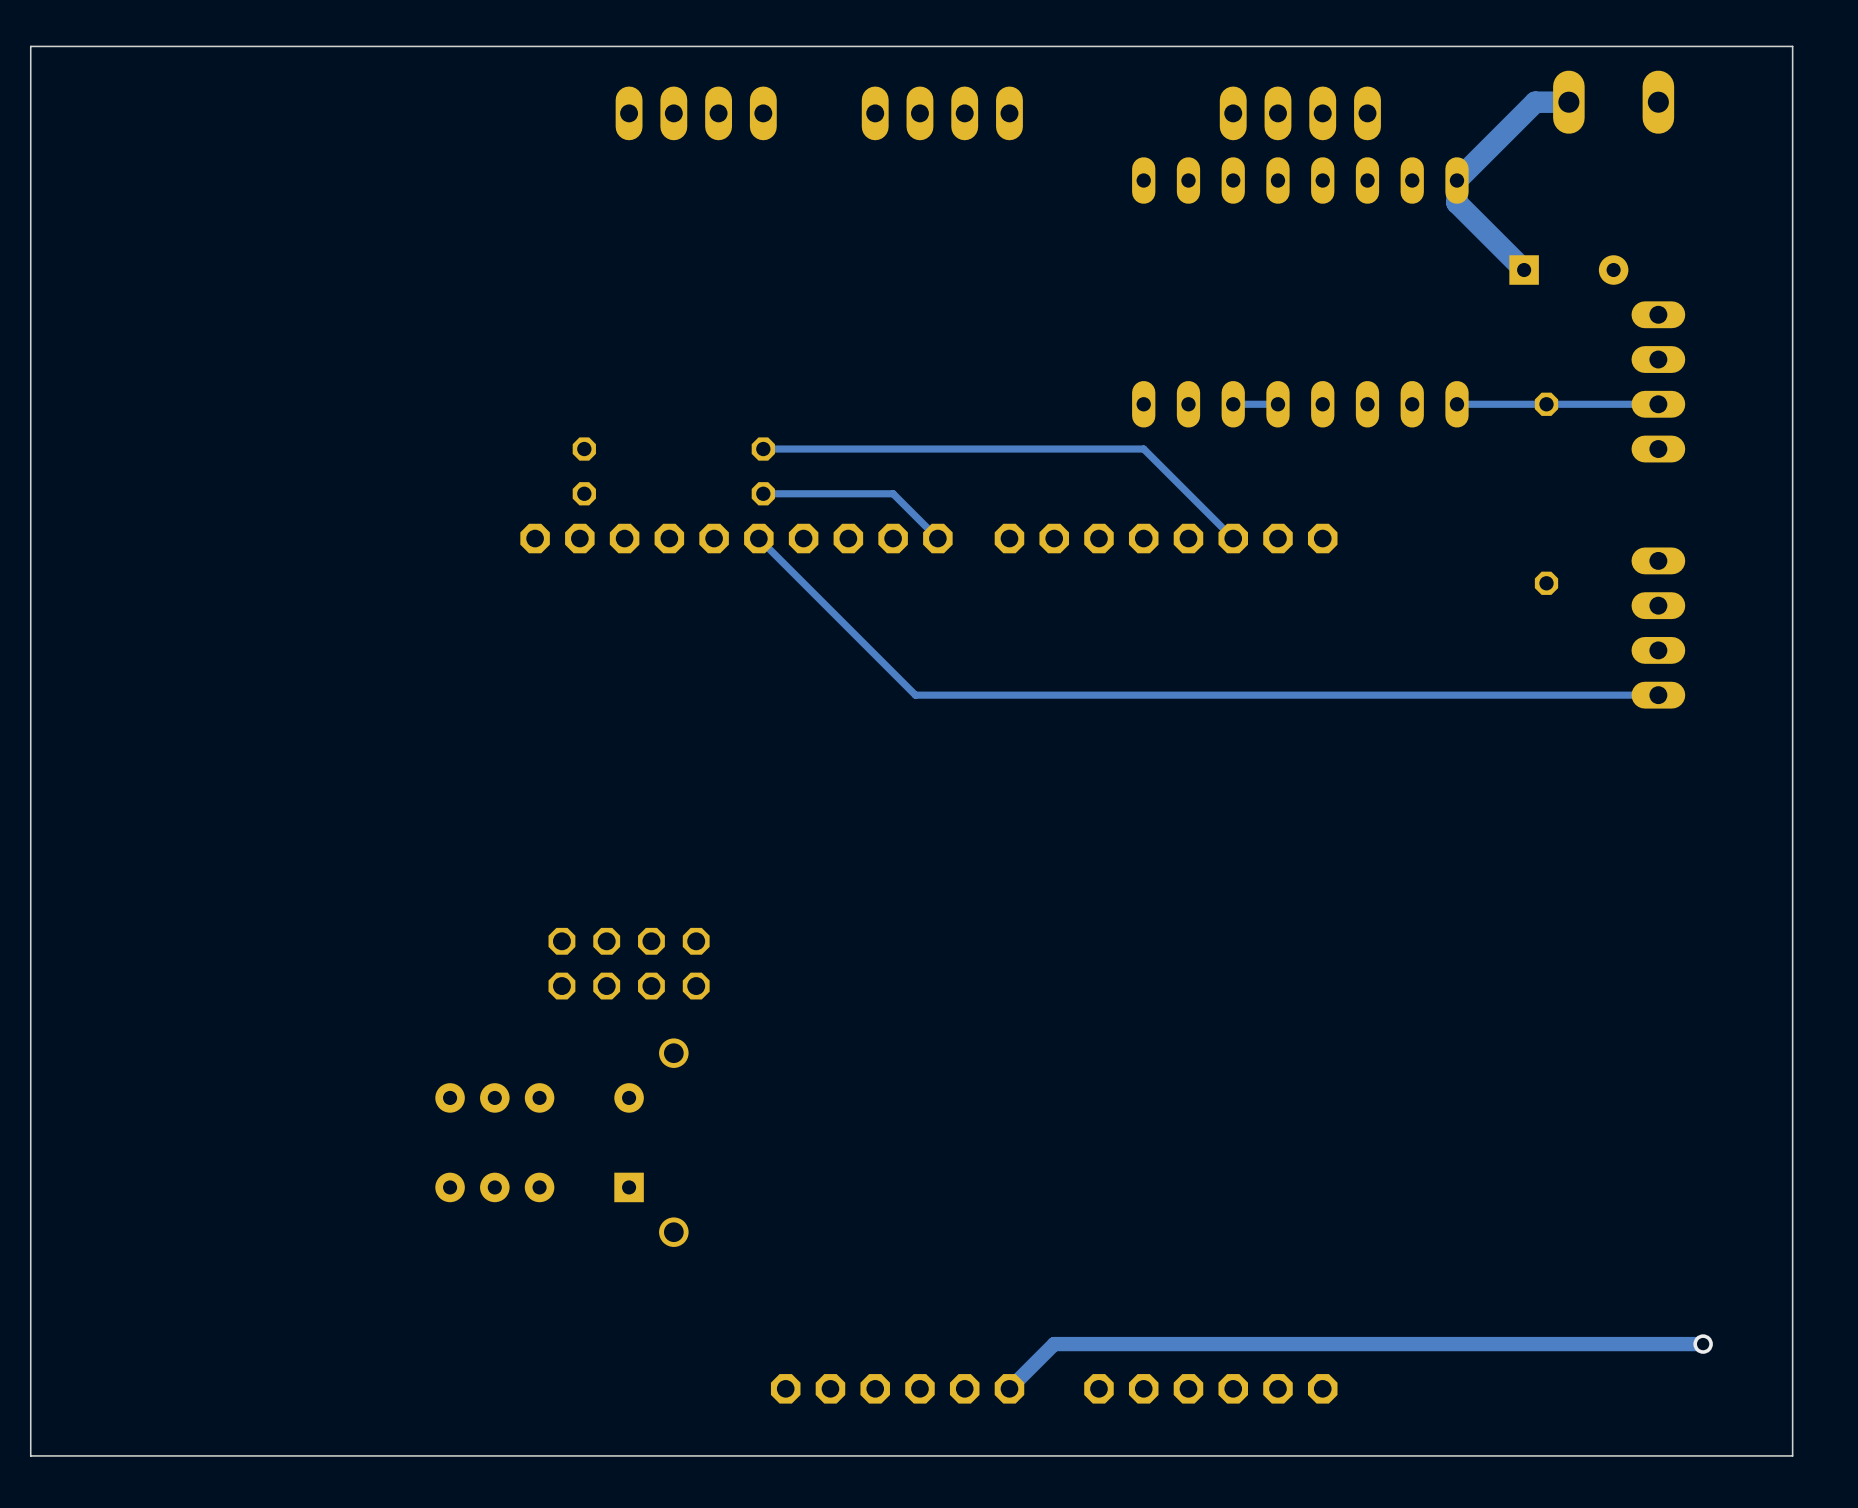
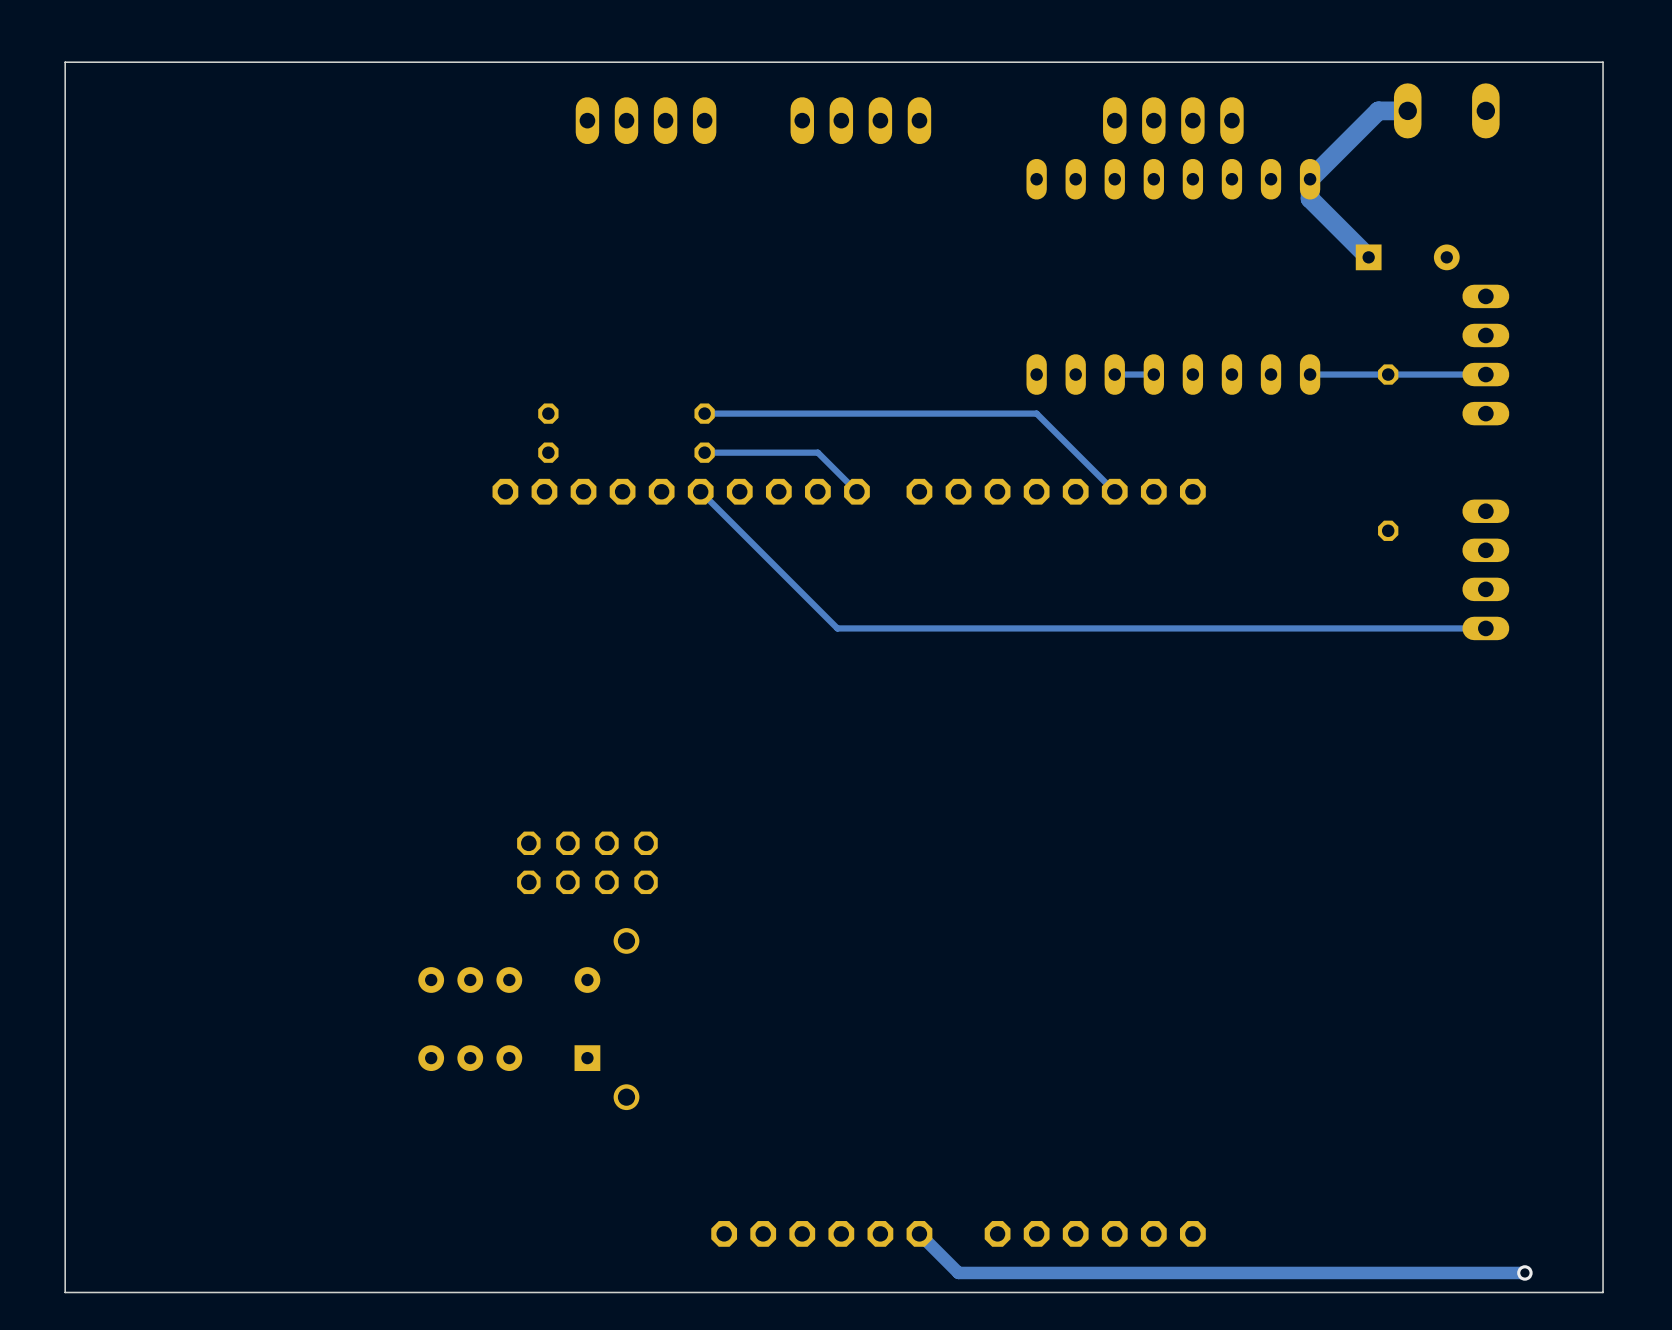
track: (1703, 1344) (1054, 1344) (1009, 1388) -> (1524, 1272) (958, 1272) (919, 1233)
via: (1703, 1344) -> none
via: none -> (1524, 1272)

